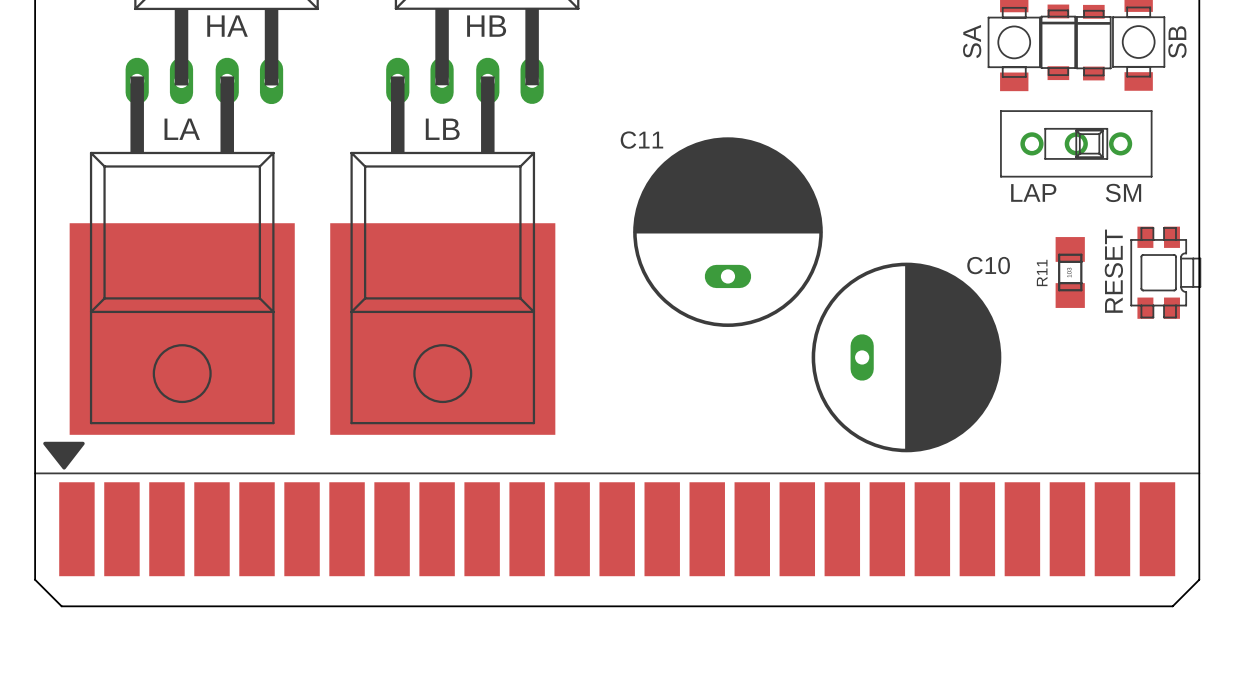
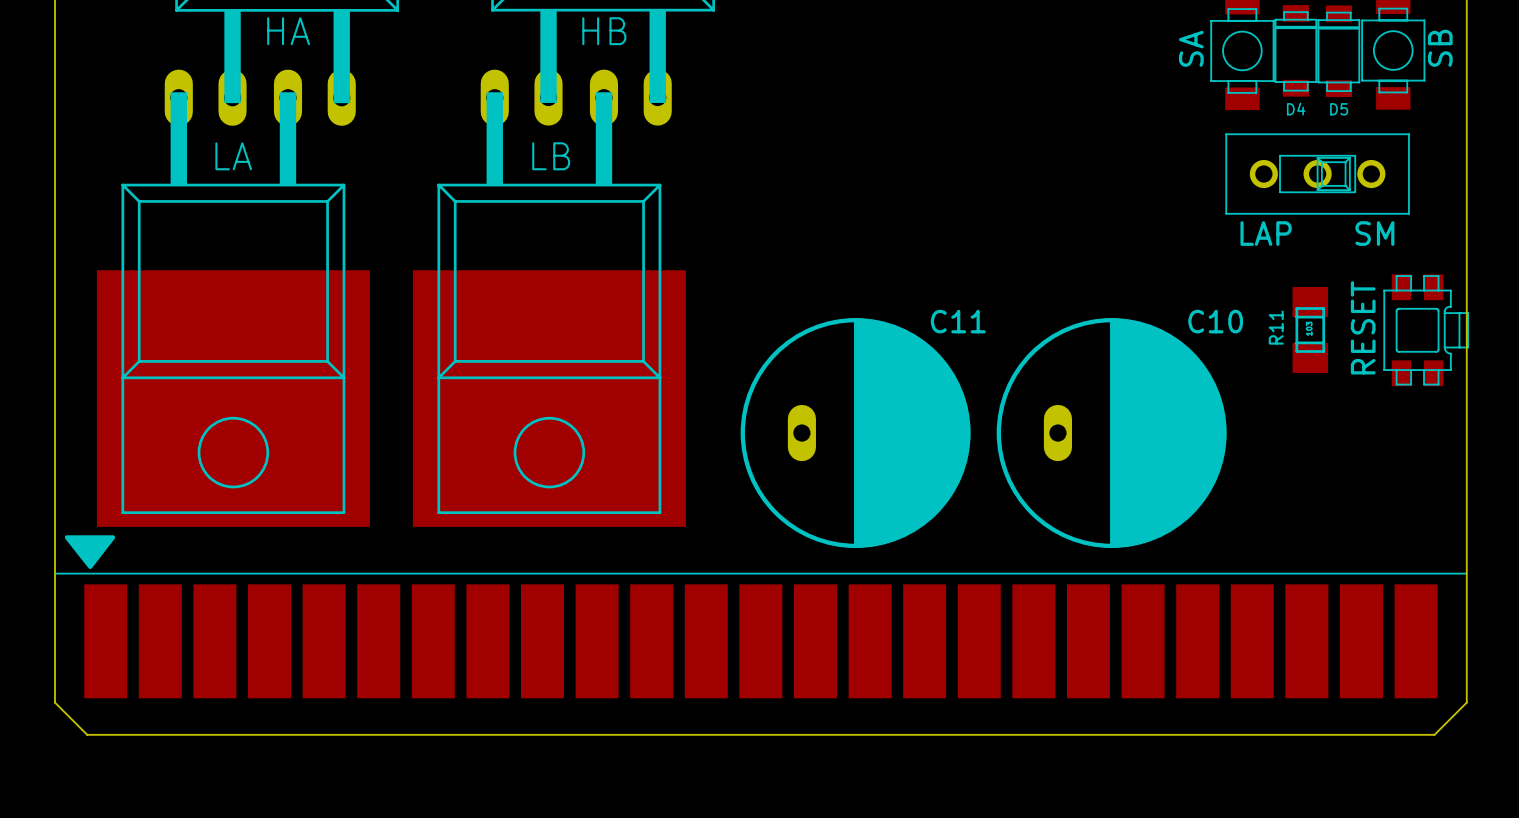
text: none -> D4 (1296, 109)
text: none -> D5 (1339, 109)
C11 rotation: 0° (727, 232) -> 90° clockwise (855, 433)
C11 position: (727, 232) -> (855, 433)

